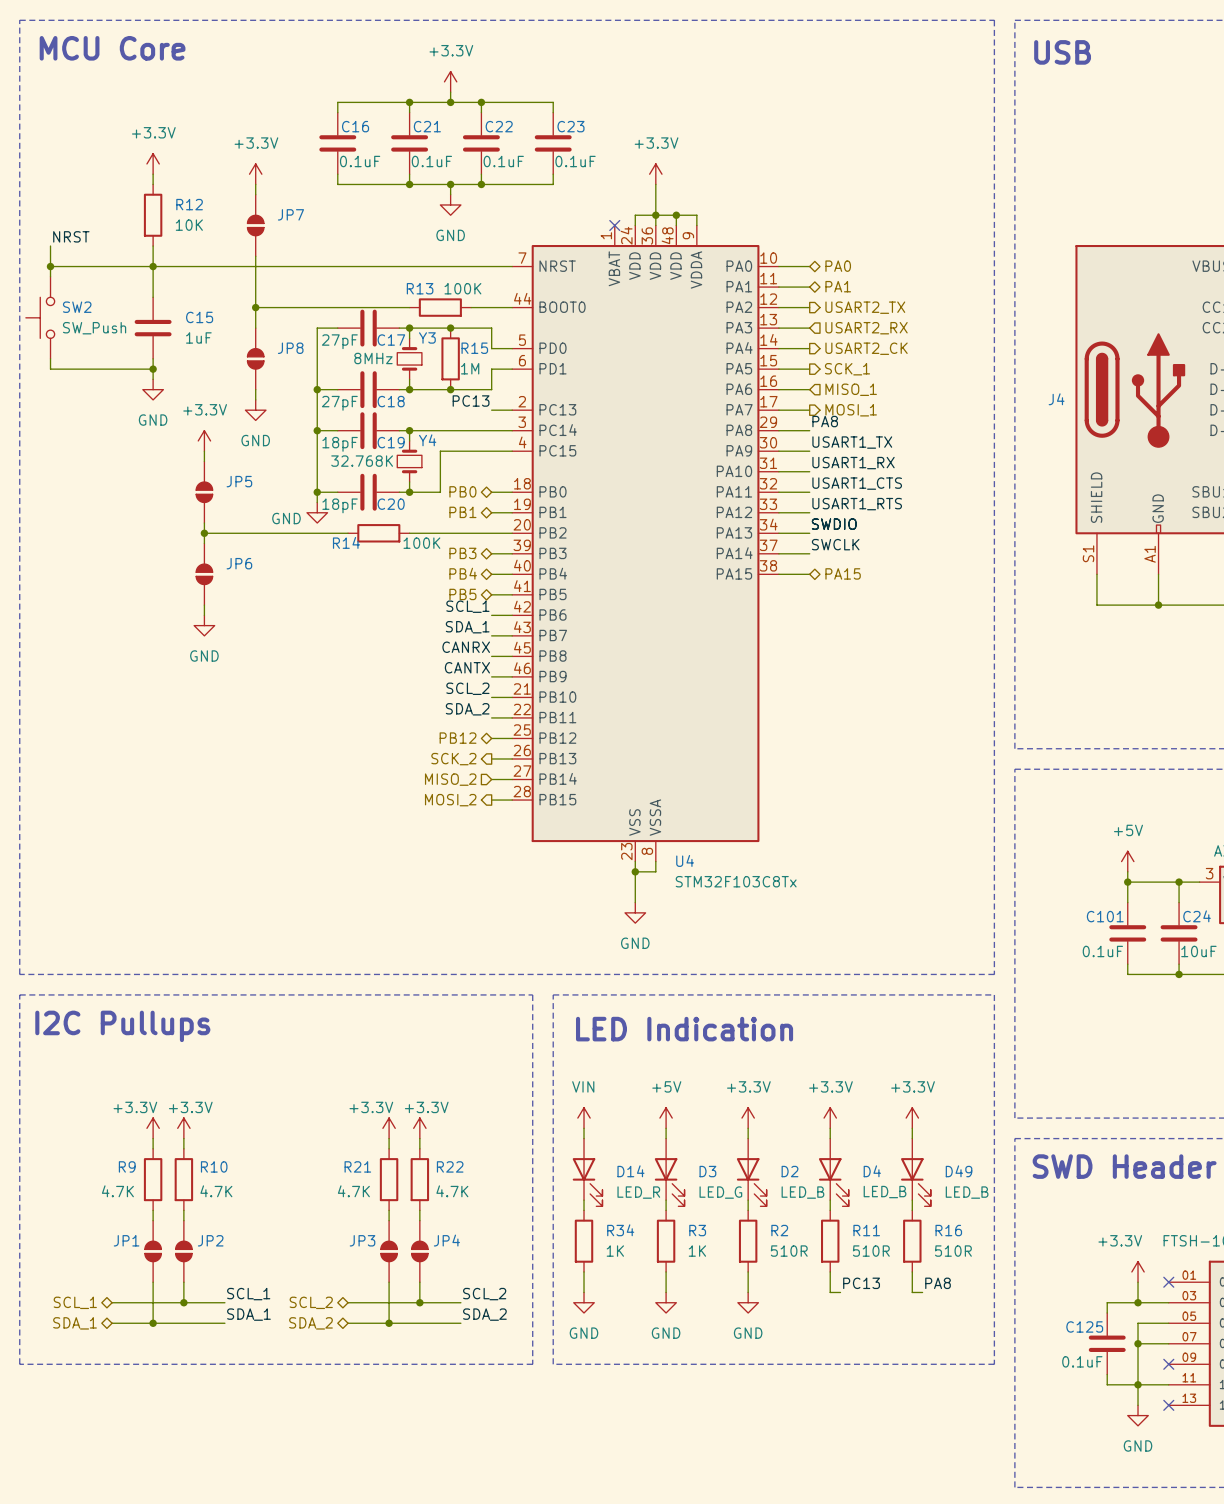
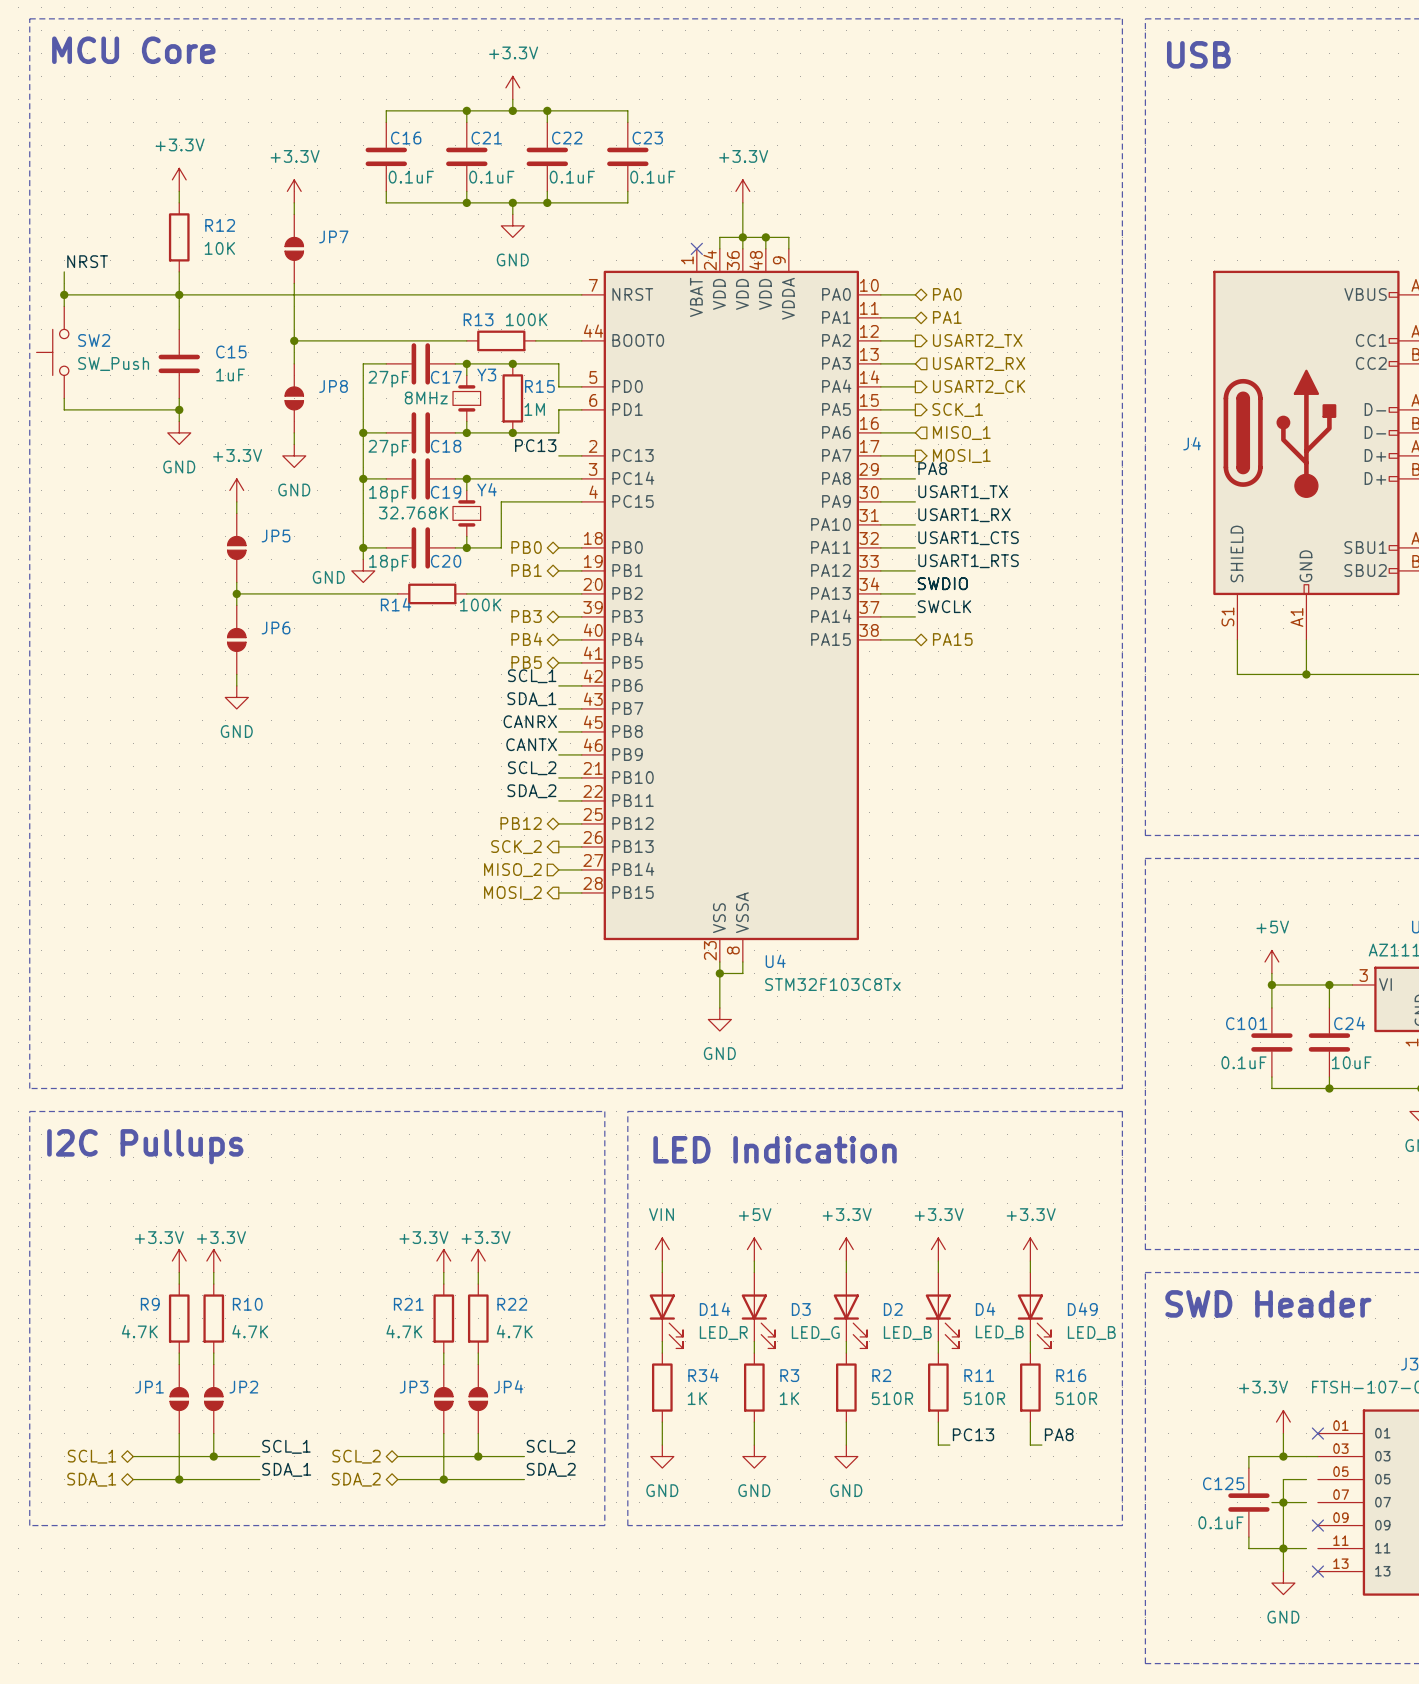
wire: (1158, 1323) (1168, 1323) -> none
wire: (1158, 1343) (1168, 1343) -> (1271, 1502) (1283, 1502)
wire: (1158, 1384) (1168, 1384) -> none

